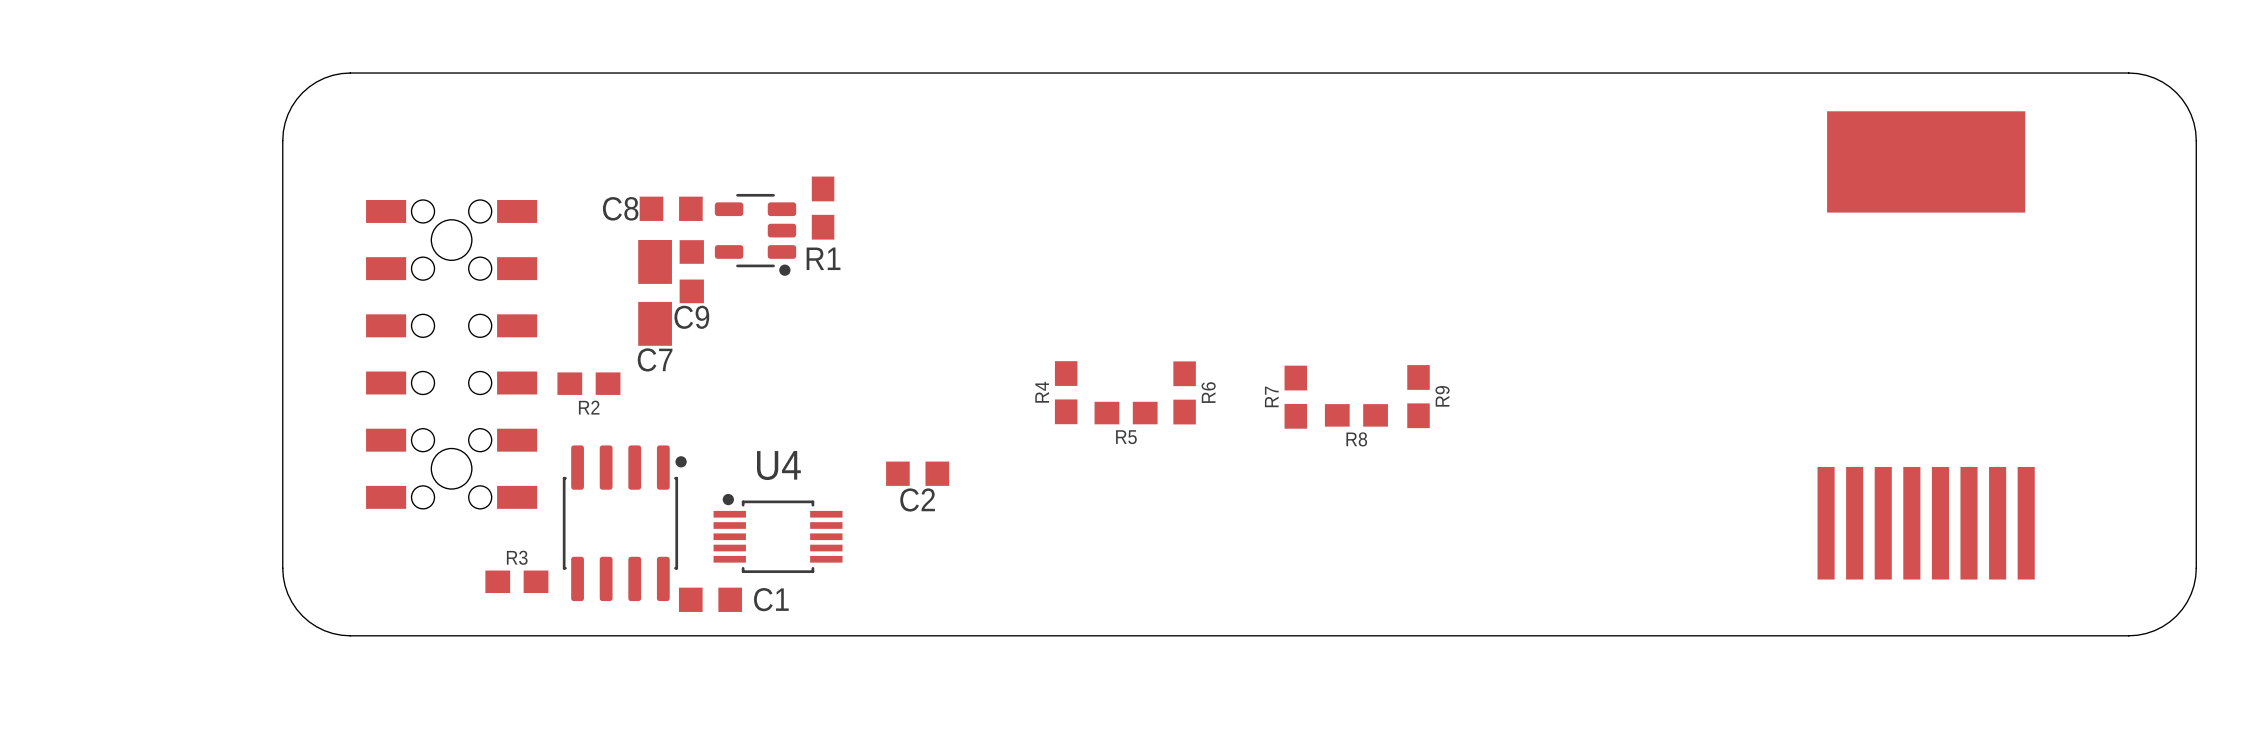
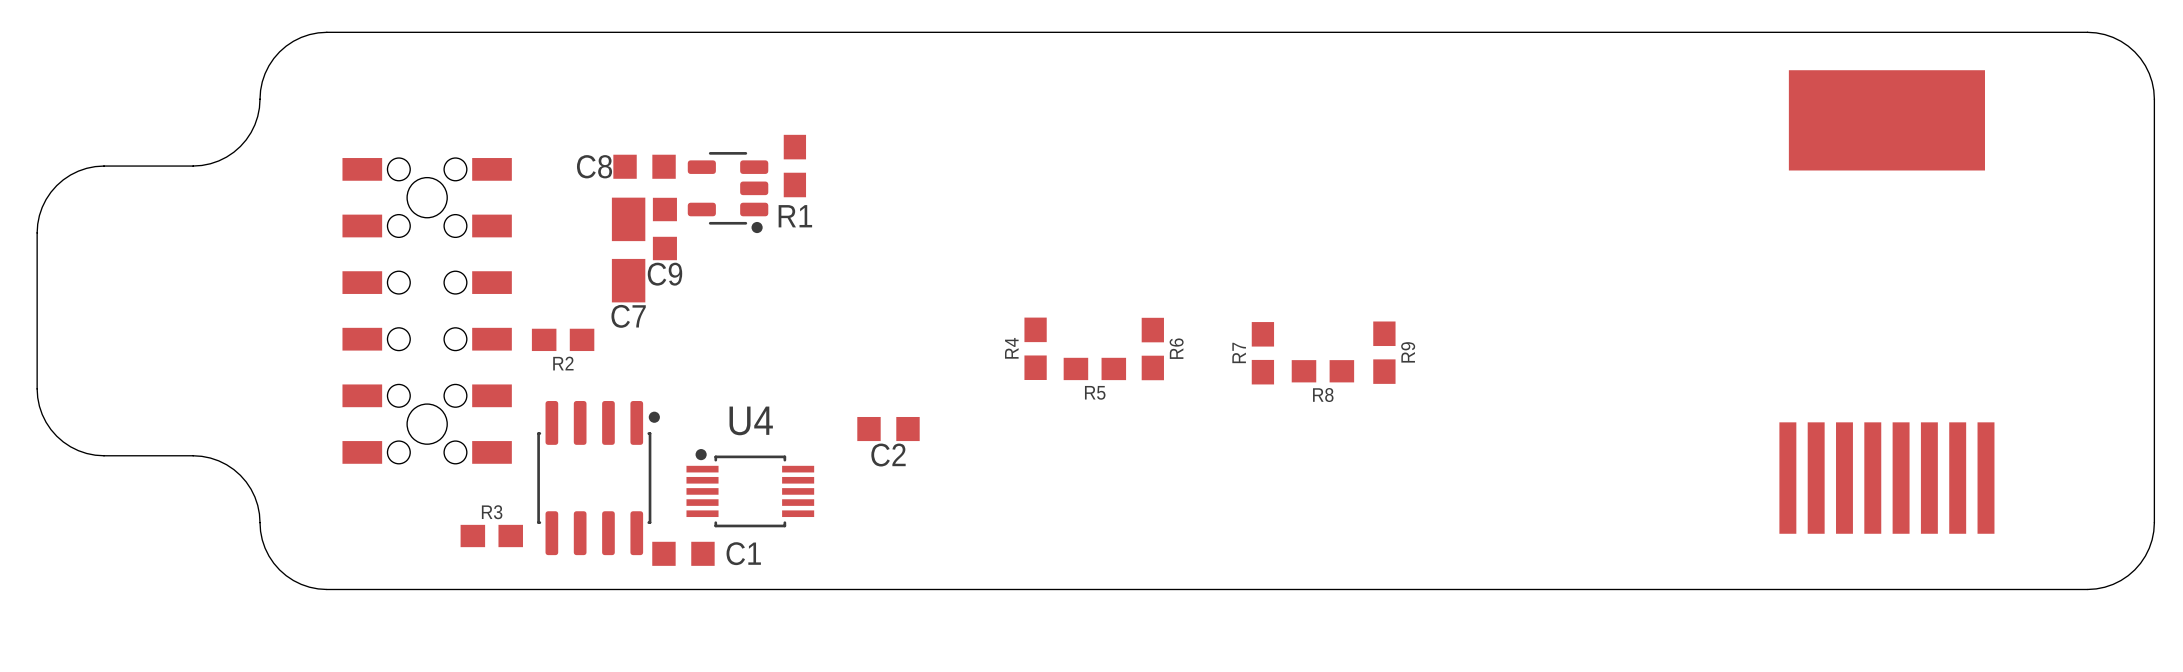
board edge: (282, 140) (282, 568) -> (260, 99) (257, 116) (251, 132) (240, 146) (226, 157) (201, 165) (104, 166) (78, 171) (63, 179) (50, 192) (39, 215) (37, 232) (37, 397) (42, 414) (50, 429) (70, 446) (95, 455) (193, 455) (218, 460) (233, 469) (246, 481) (257, 505) (260, 522)

